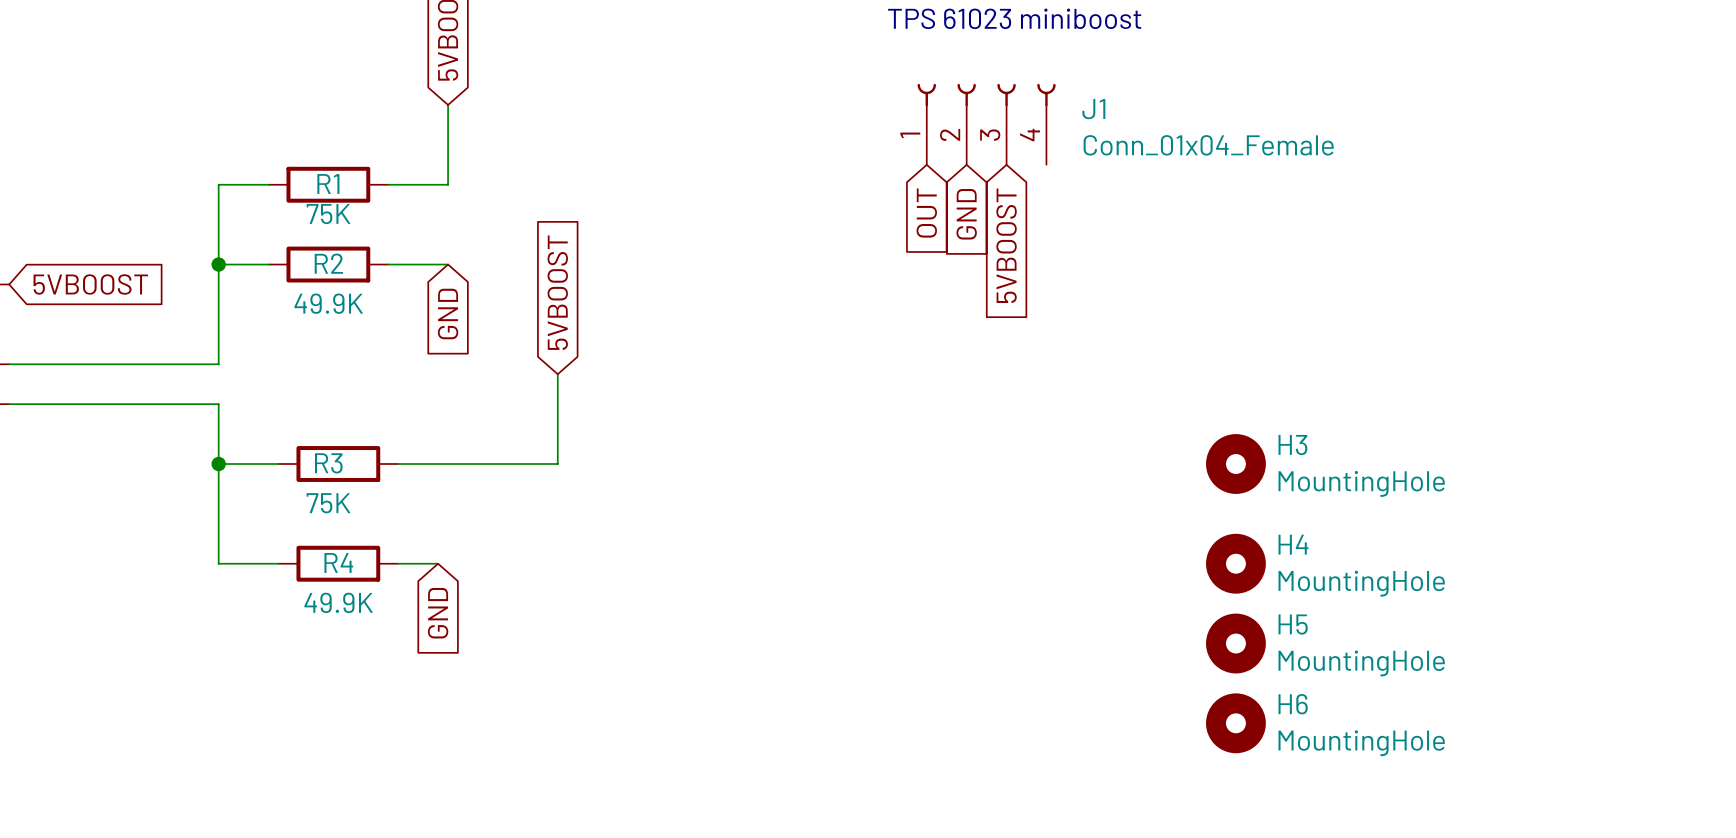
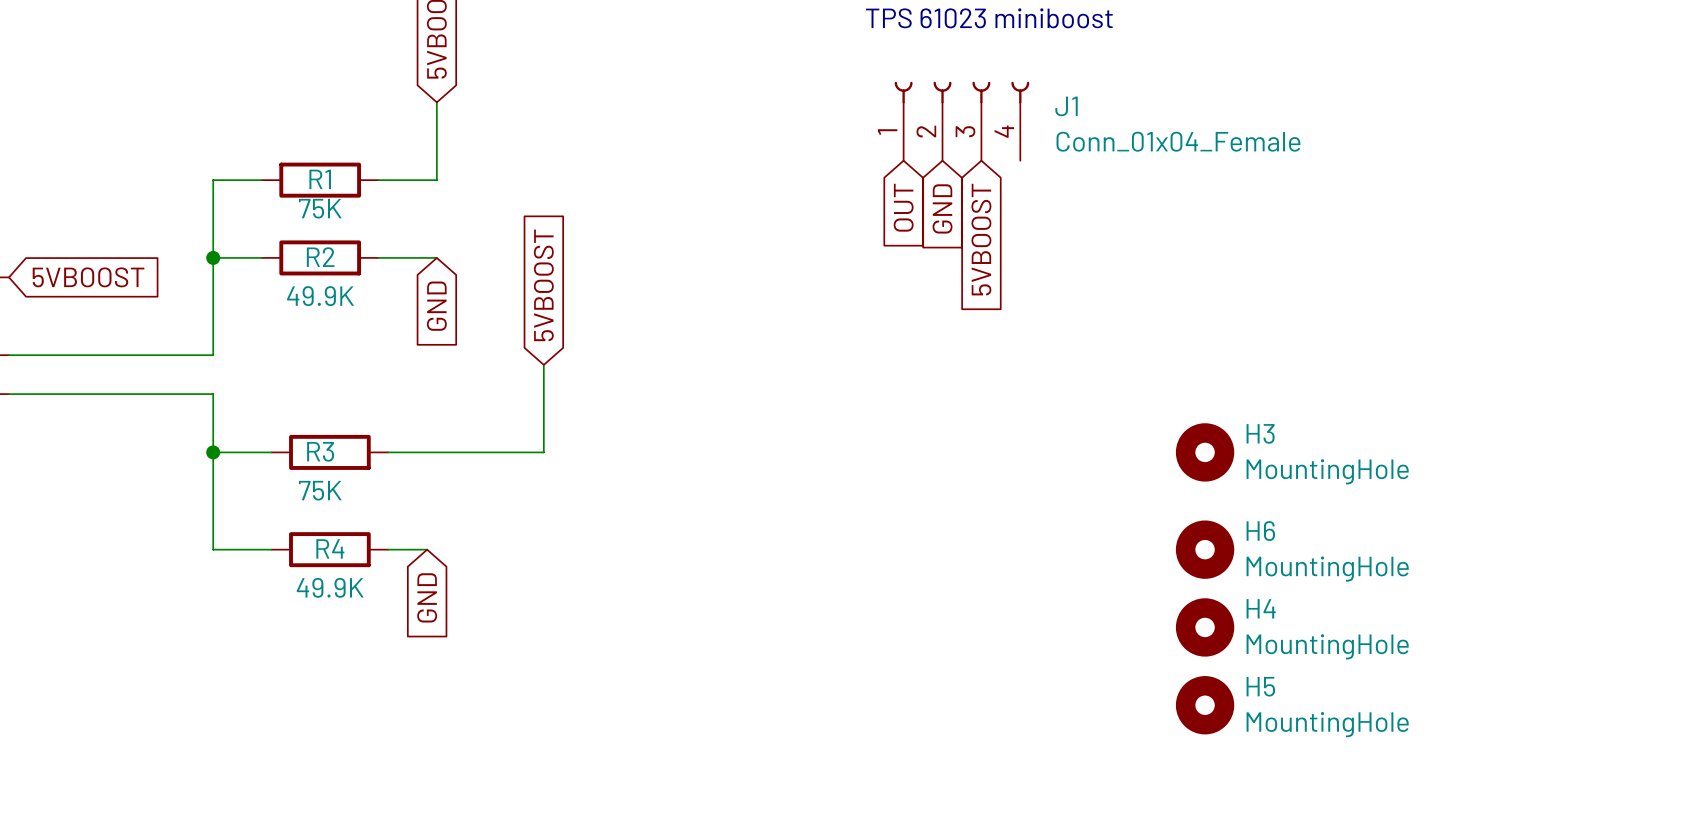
H4 name: H4 (1293, 544) -> H6 (1260, 531)
H5 name: H5 (1293, 624) -> H4 (1261, 608)
H6 name: H6 (1293, 704) -> H5 (1260, 686)

